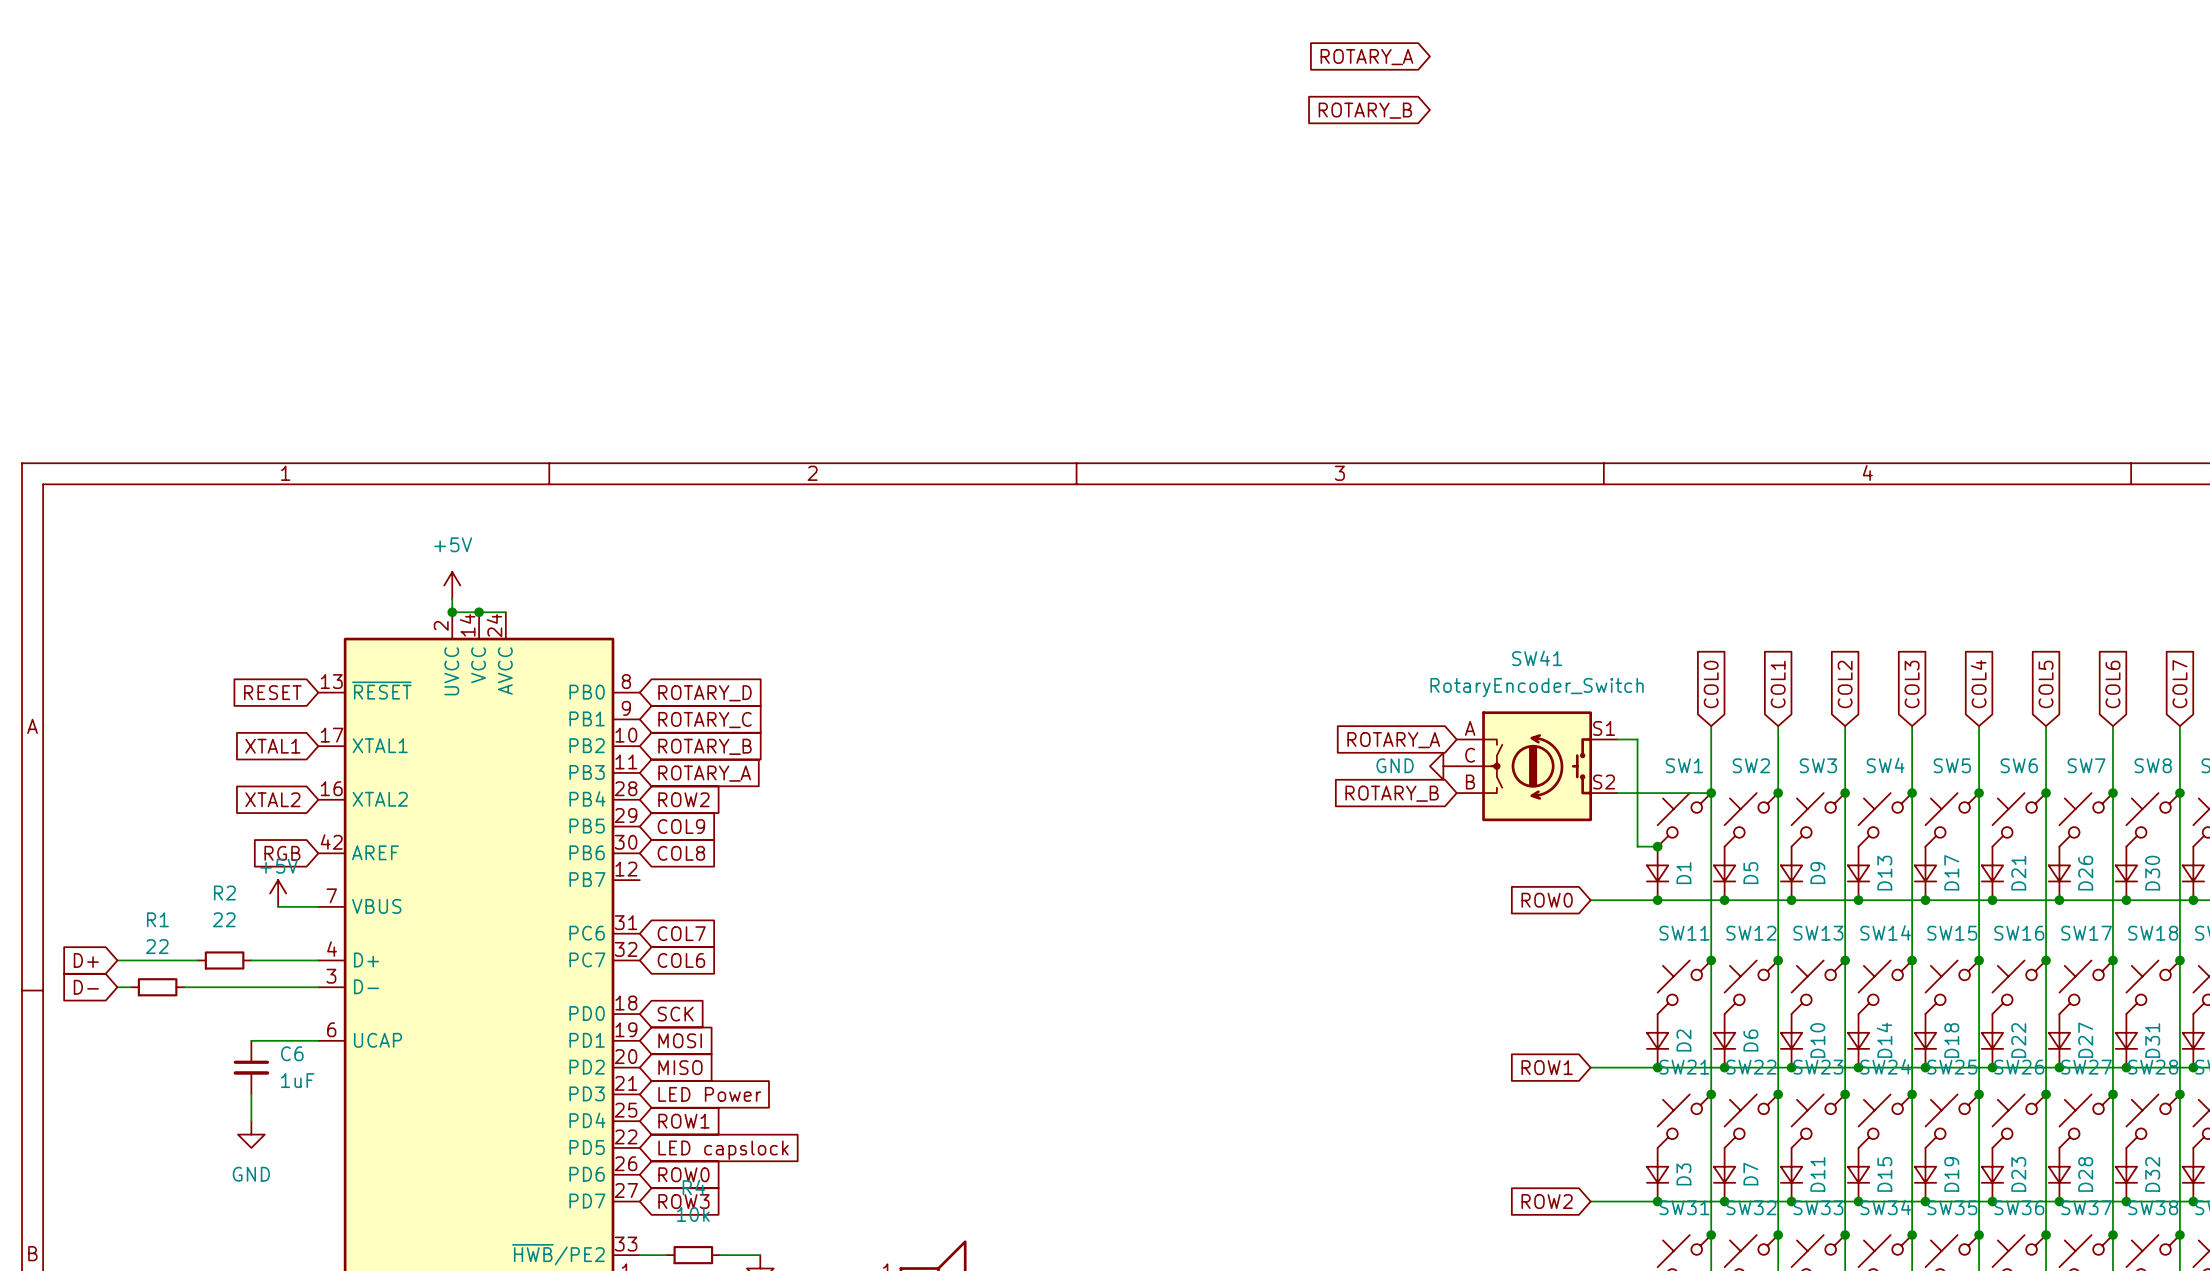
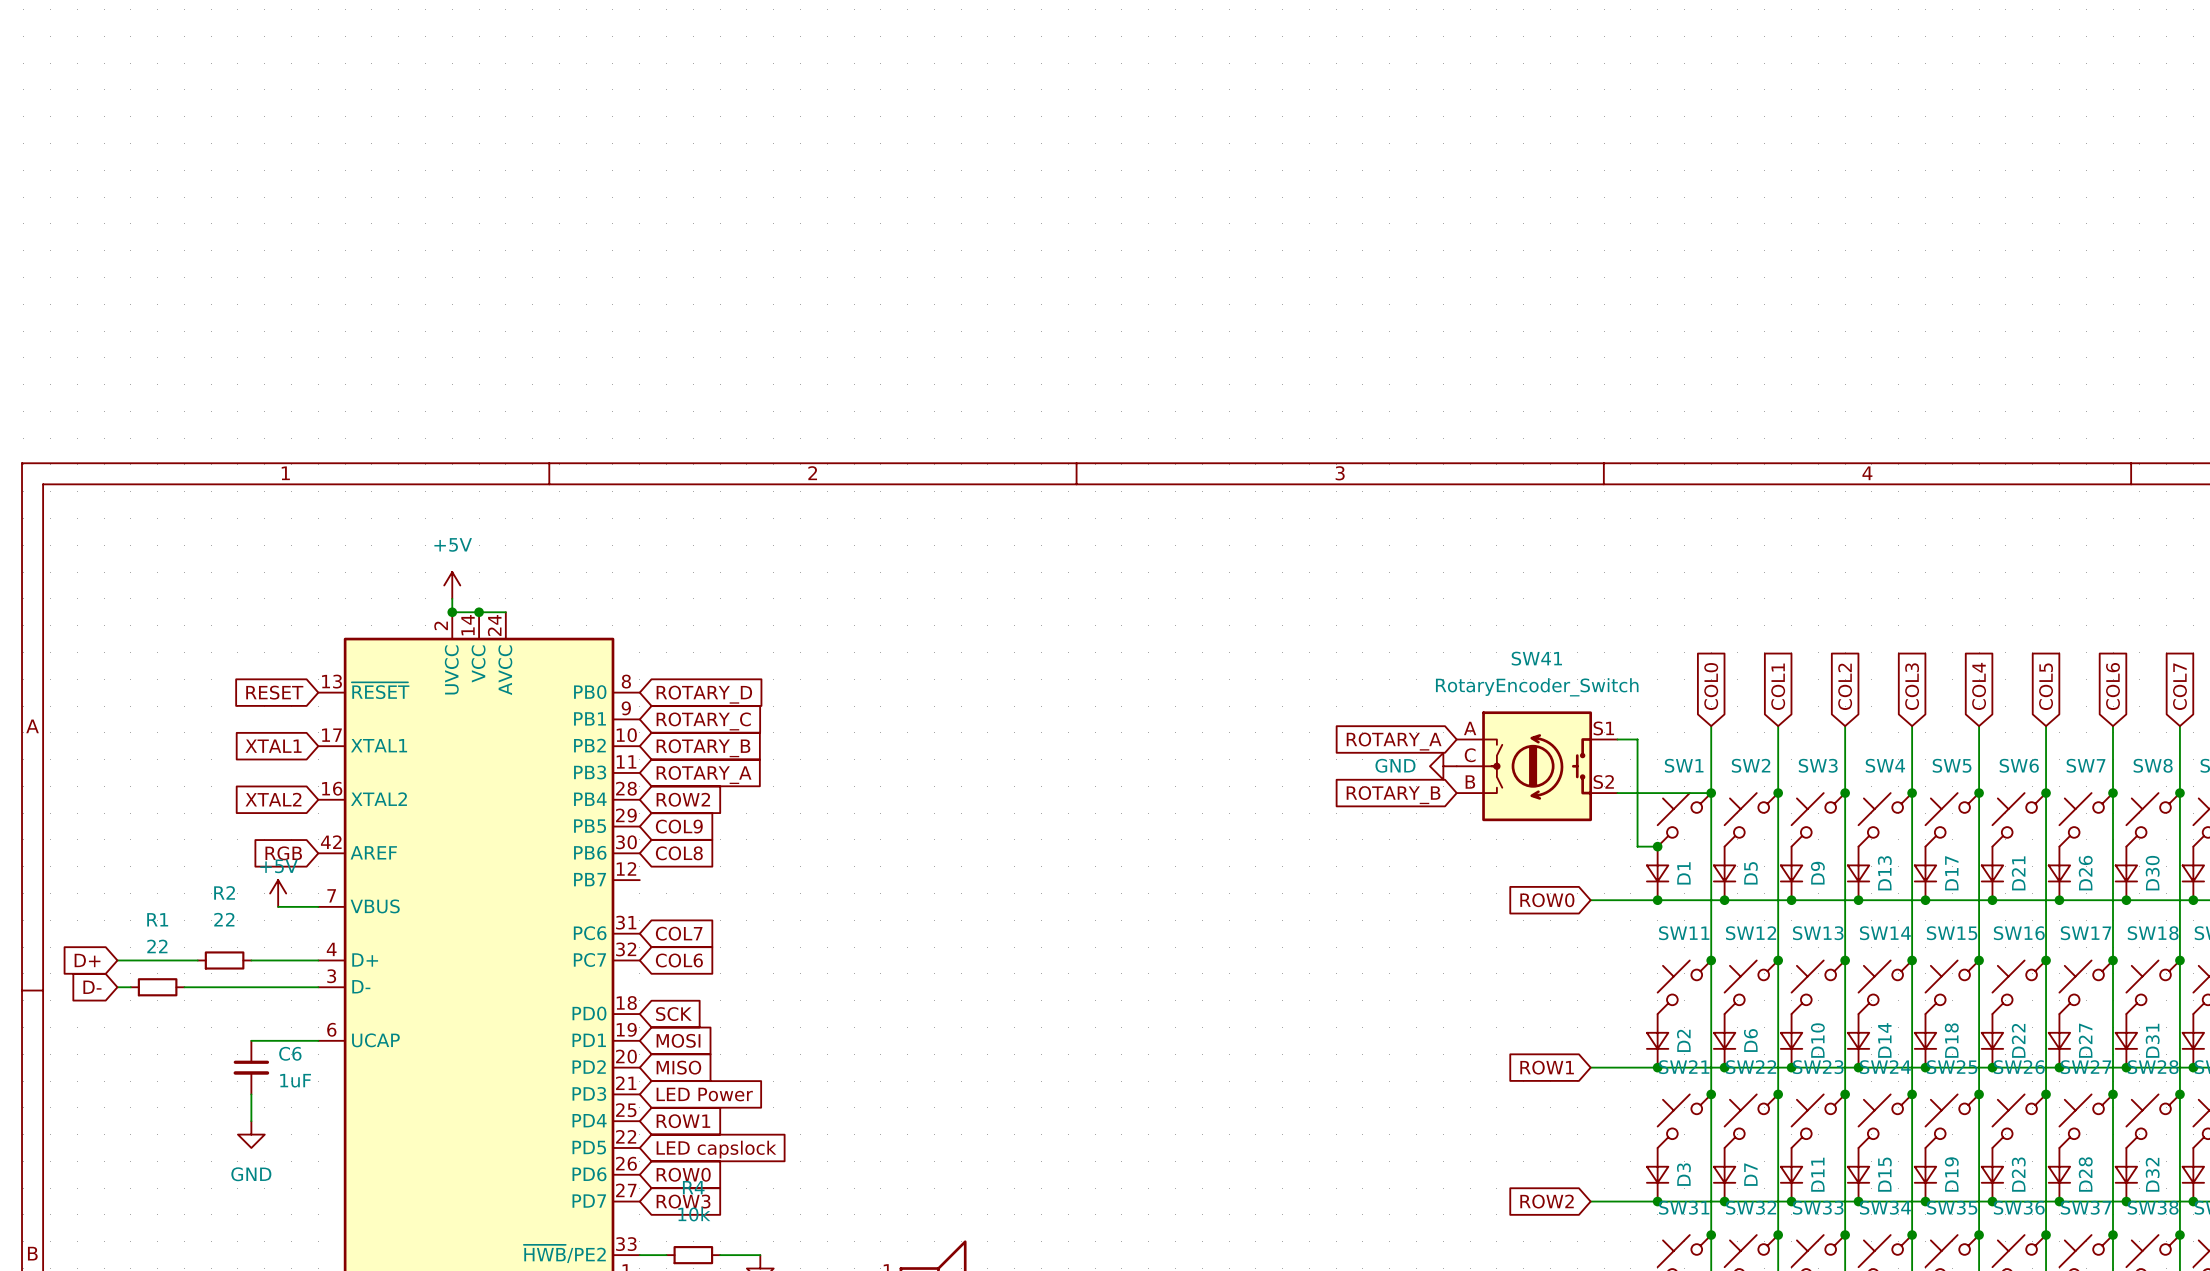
global label: ROTARY_A (1366, 57) -> none
global label: ROTARY_B (1365, 110) -> none

